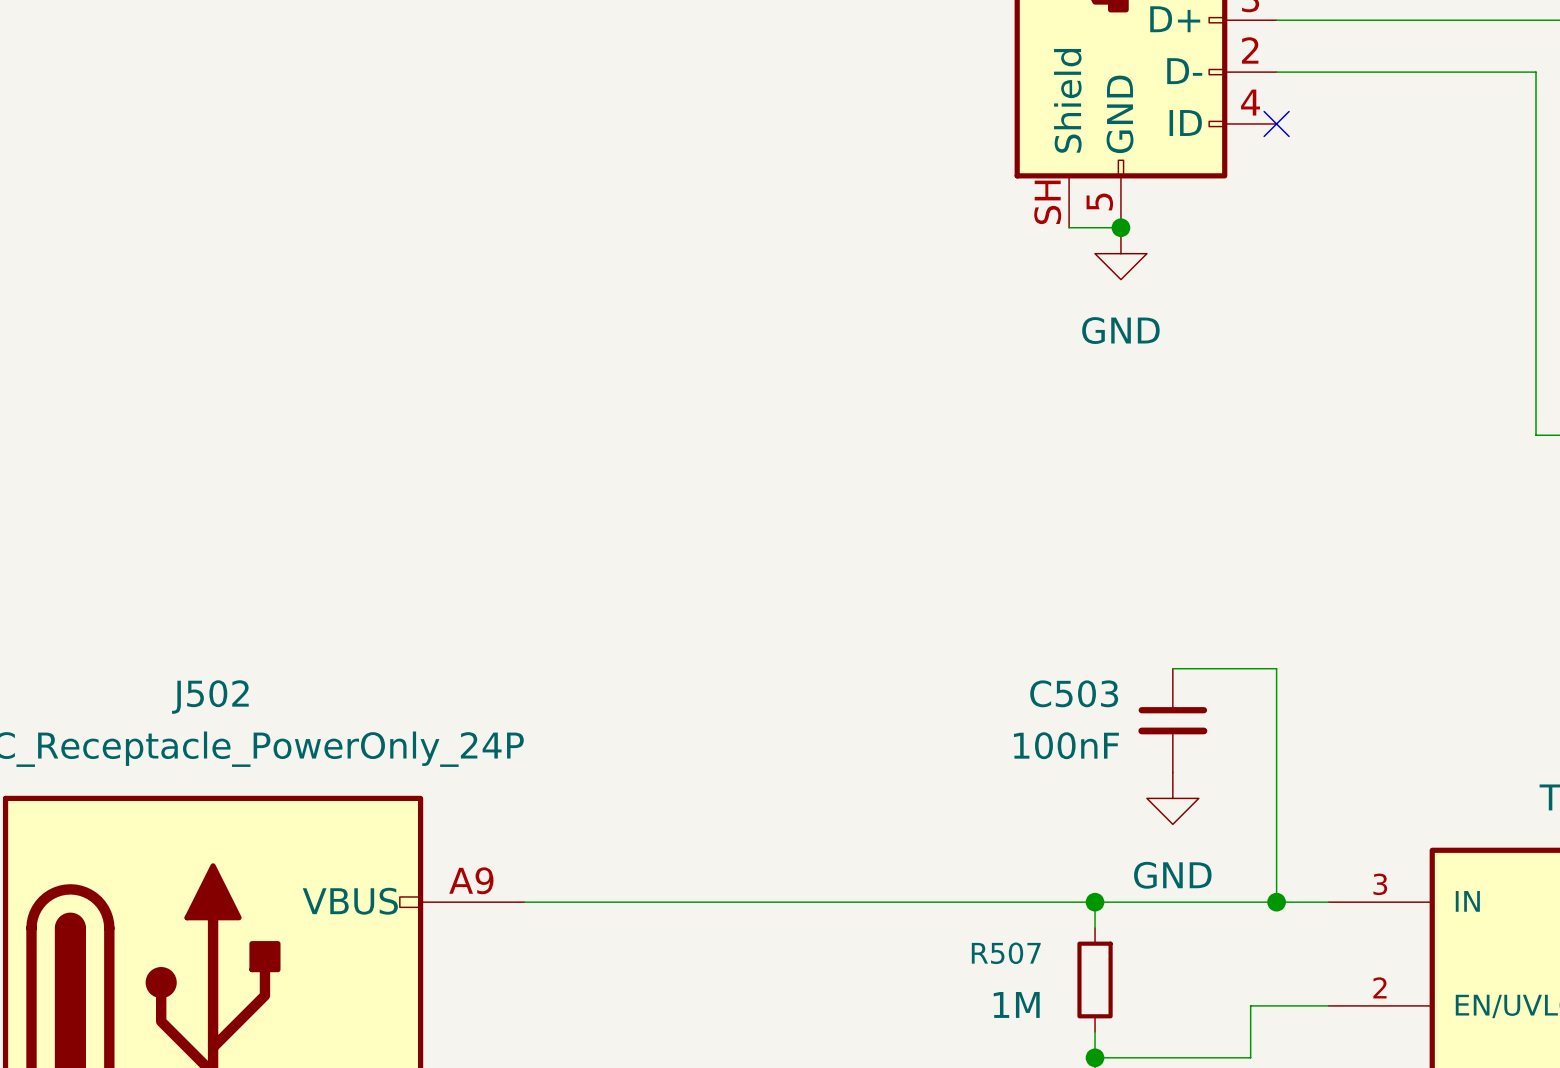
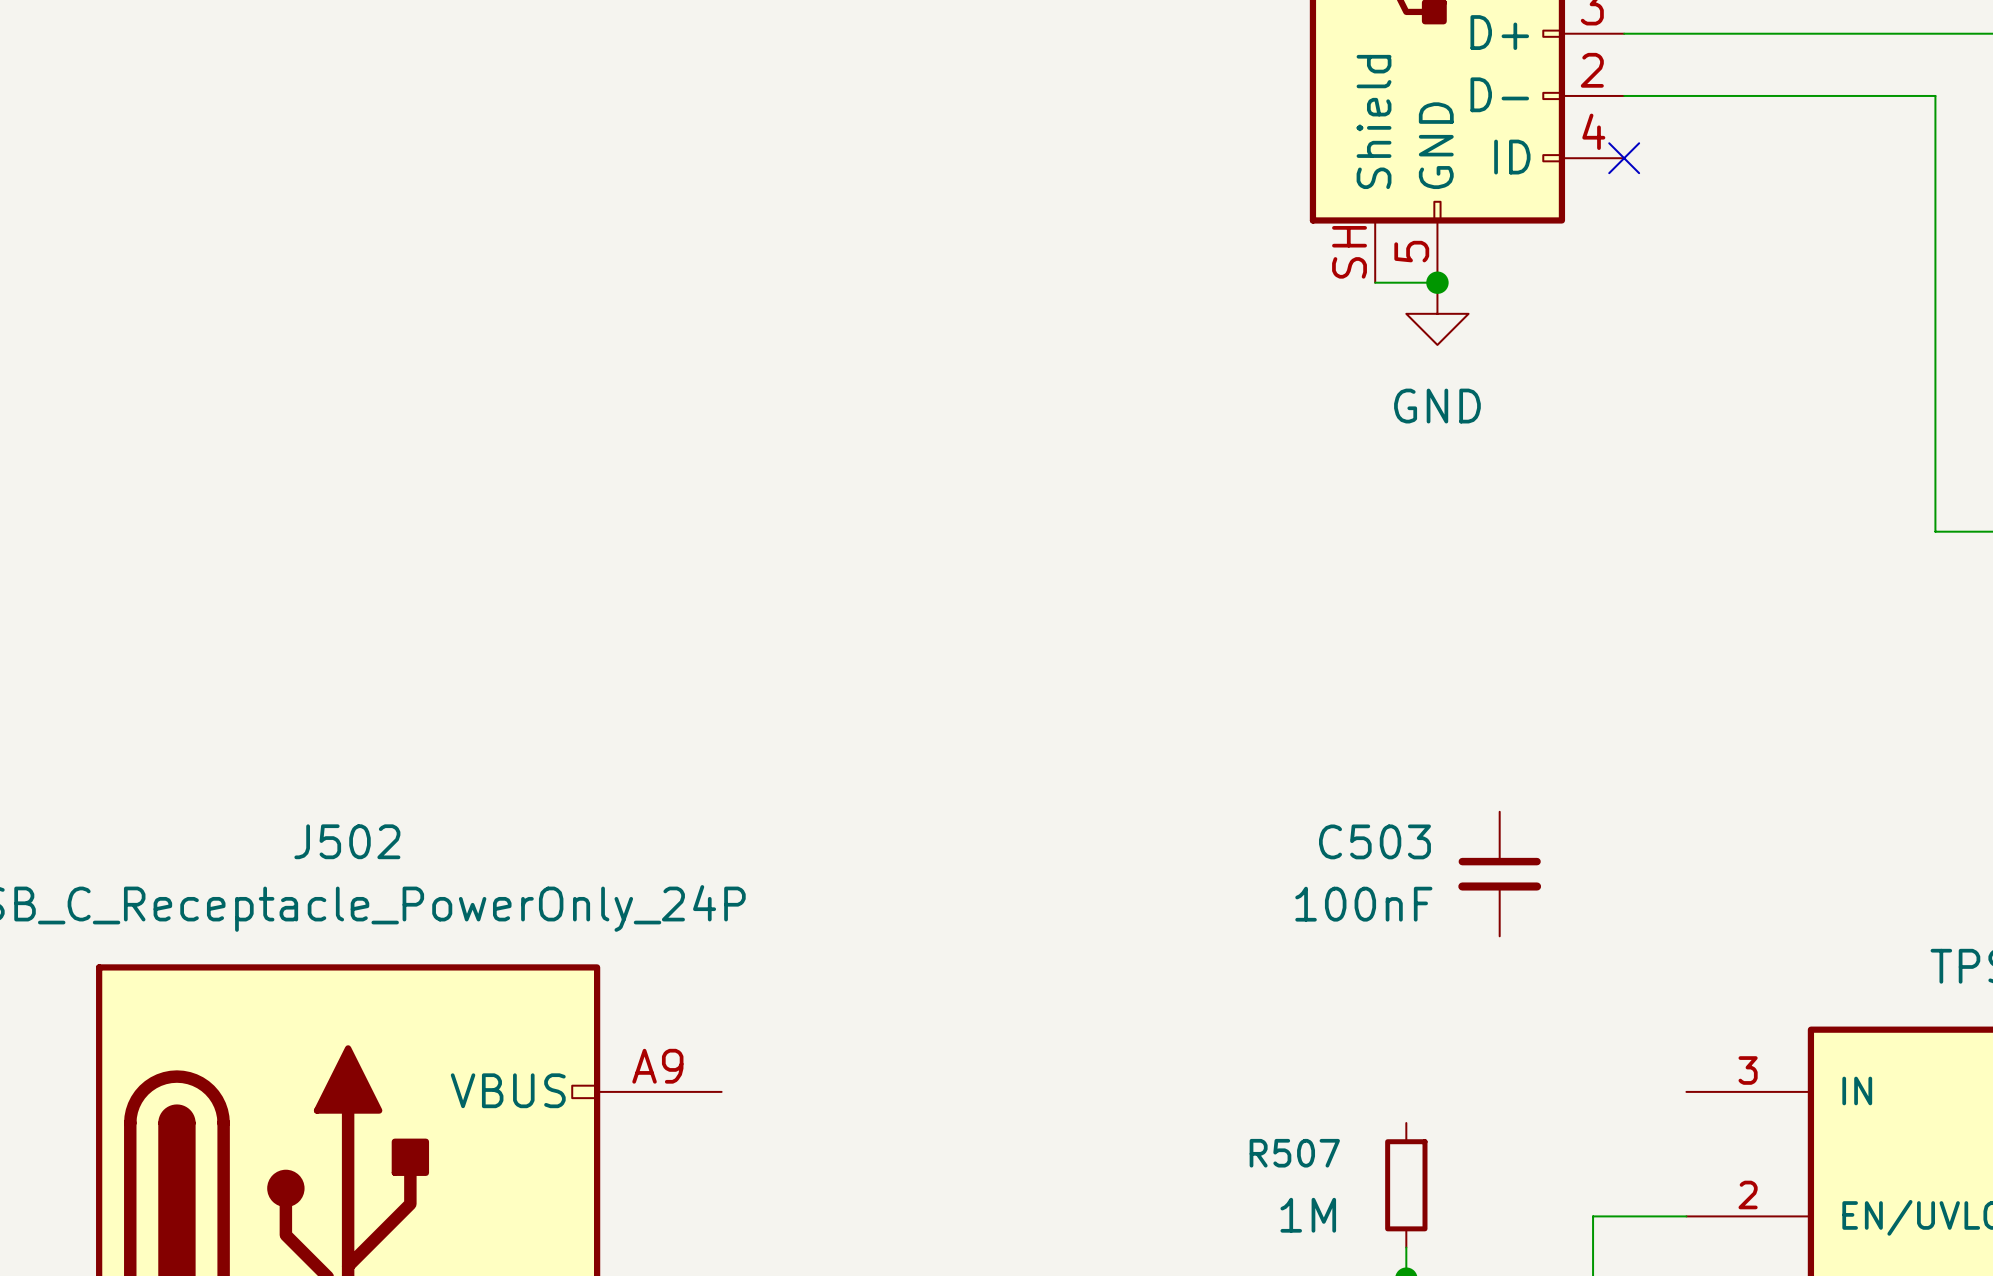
wire: (1172, 668) (1276, 668) (1276, 902) -> none
power symbol: GND (1172, 798) -> none
wire: (524, 902) (1328, 902) -> none
wire: (1095, 902) (1095, 928) -> none
junction: (1095, 902) -> none
junction: (1276, 902) -> none

